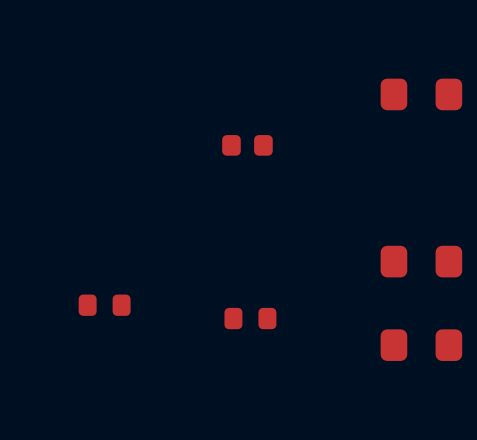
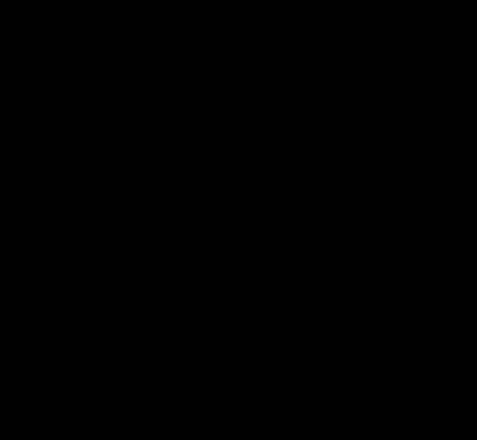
part: (421, 94) -> none
part: (247, 145) -> none
part: (421, 261) -> none
part: (104, 305) -> none
part: (250, 318) -> none
part: (421, 345) -> none

